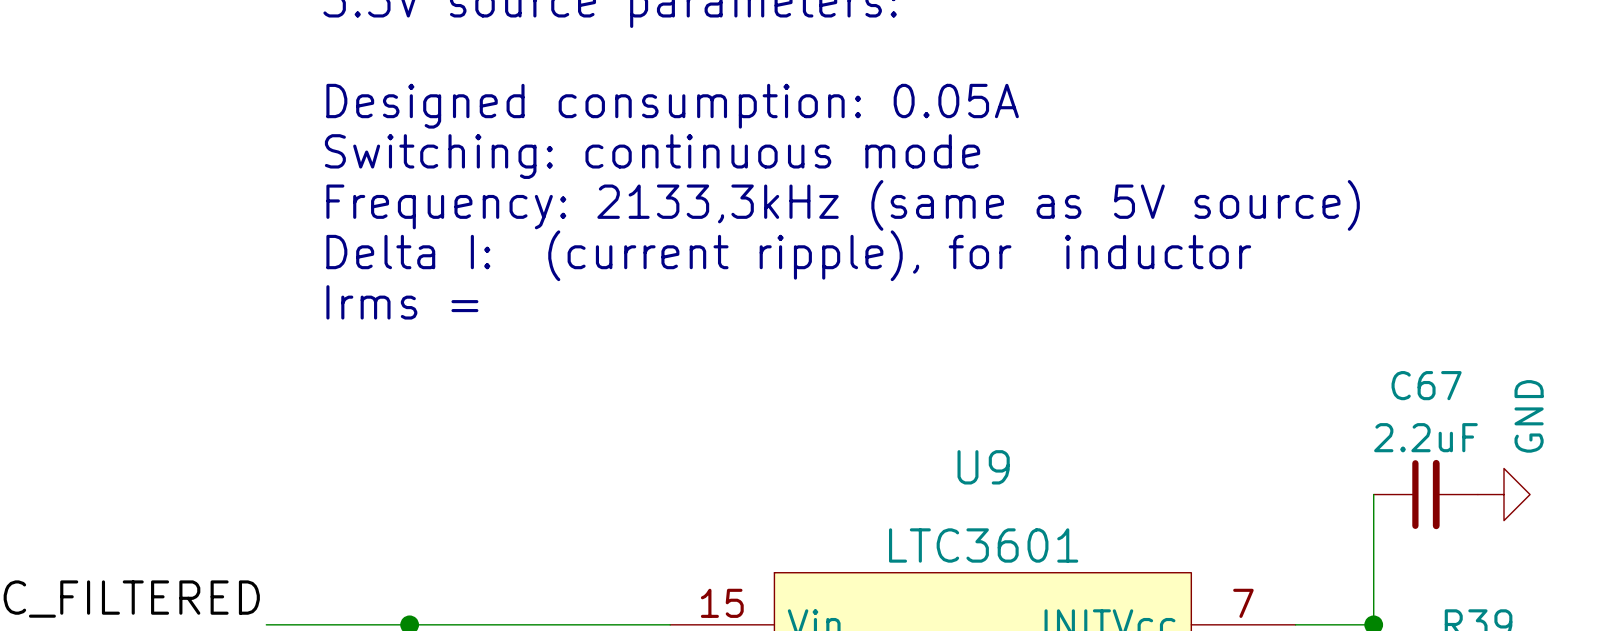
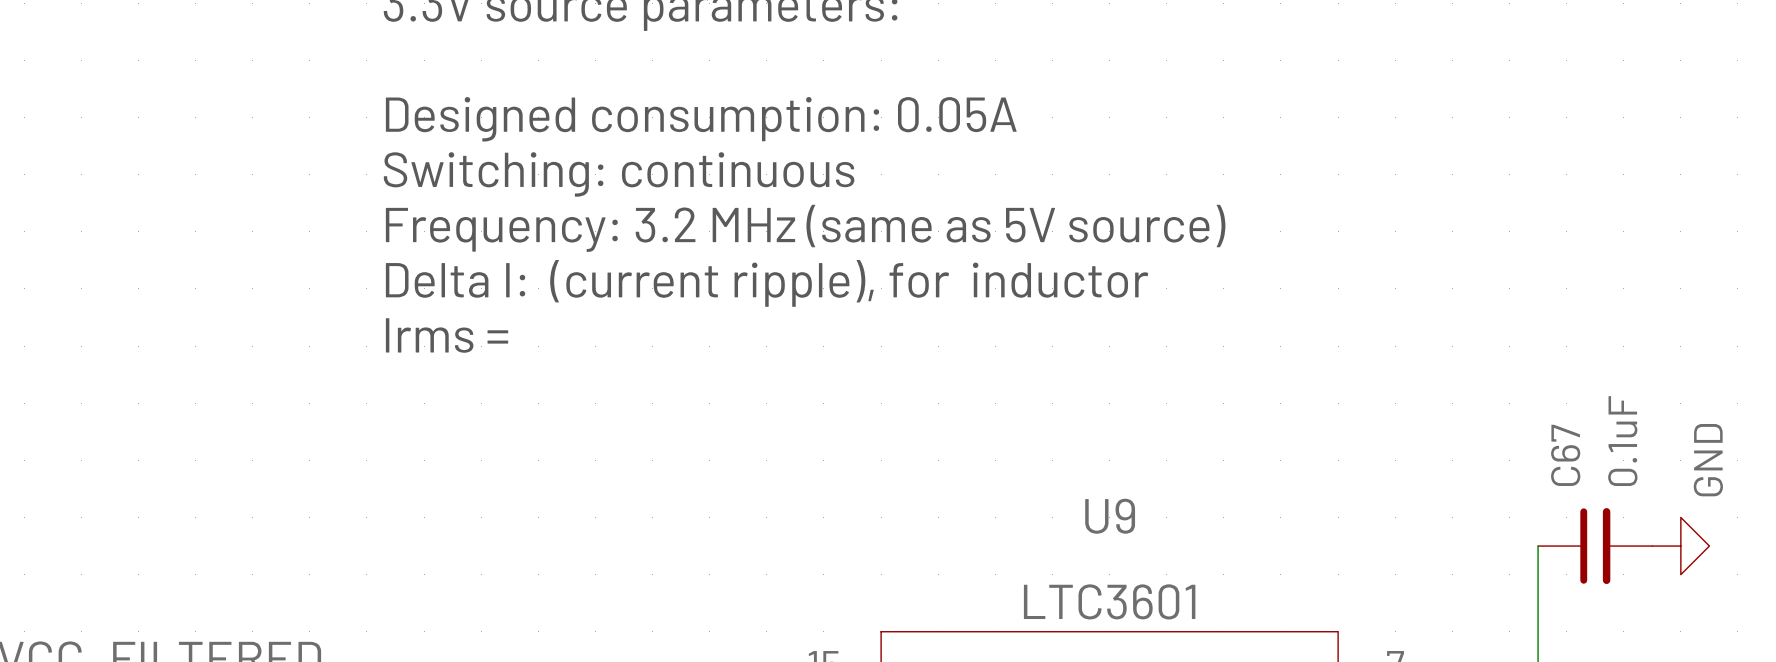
text: Switching: continuous mode (652, 156) -> Switching: continuous (619, 174)
text: Frequency: 2133,3kHz (same as 5V source) (843, 205) -> Frequency: 3.2 MHz (same as 5V source) (805, 228)
C67 name rotation: 0° (1426, 385) -> 90° counterclockwise (1565, 455)
C67 value: 2.2uF (1425, 437) -> 0.1uF (1622, 441)

